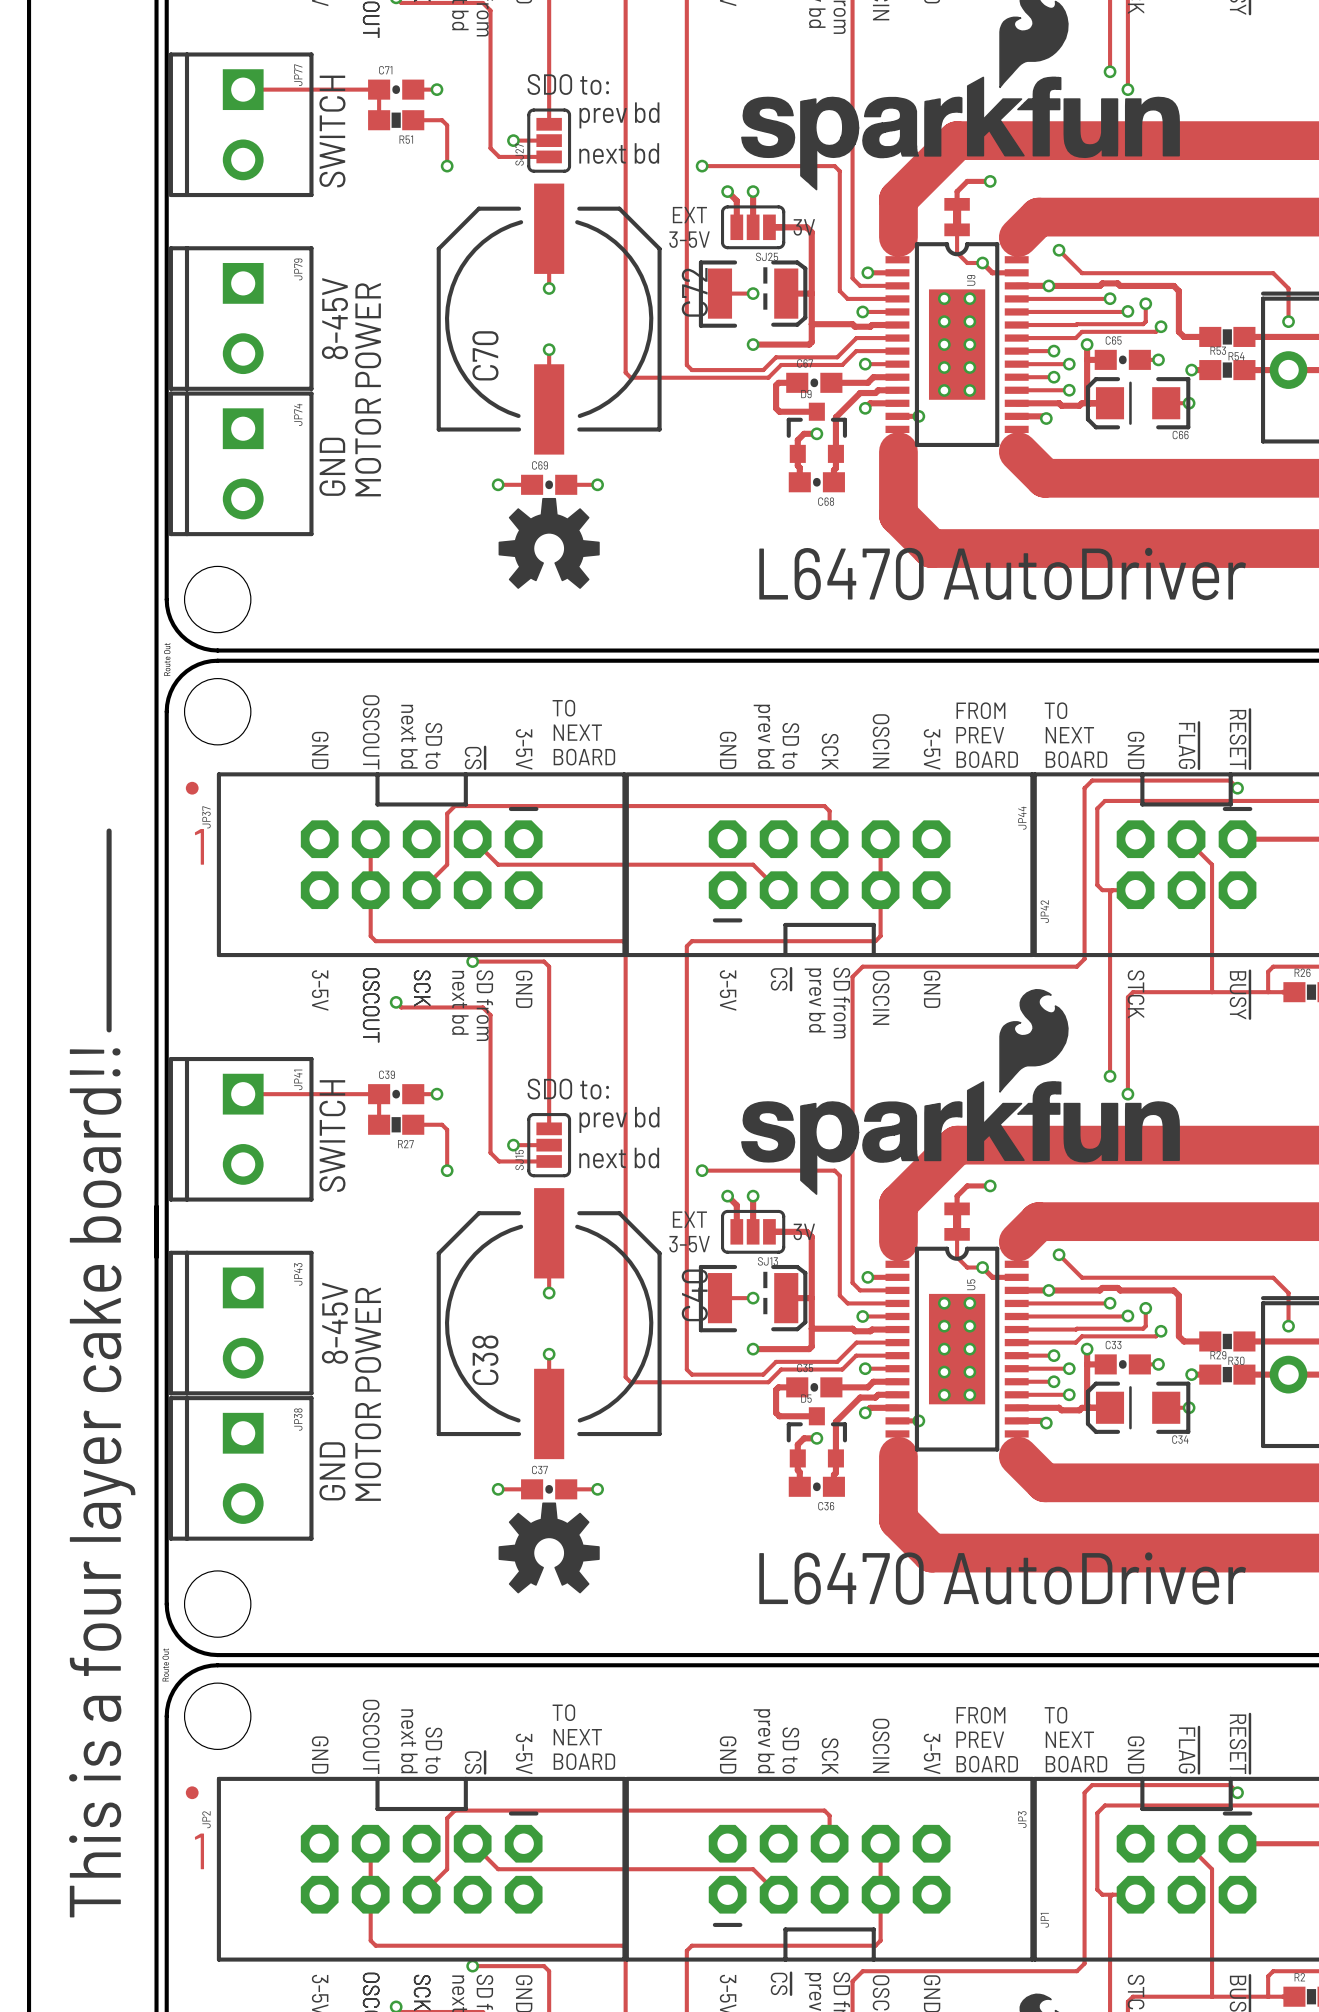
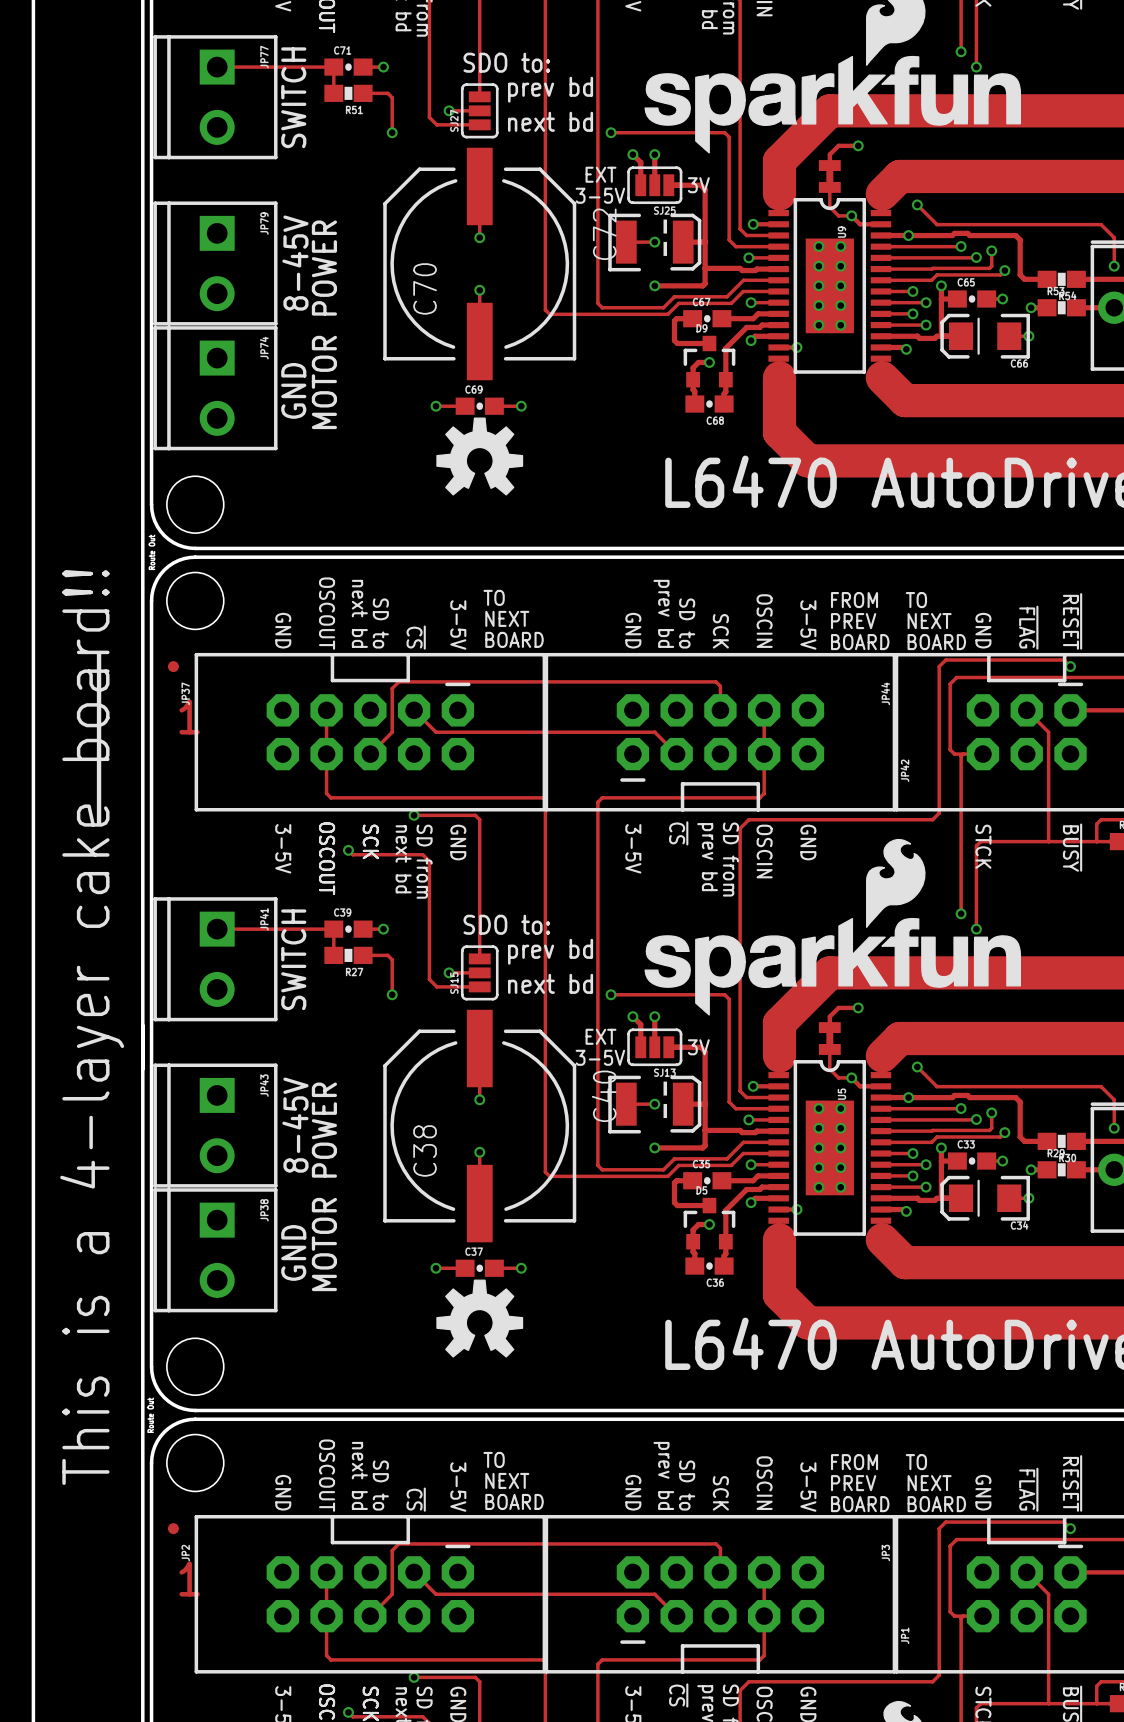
line: (109, 831) (109, 1029) -> (99, 653) (99, 824)
text: This is a four layer cake board!! (102, 1482) -> This is a 4-layer cake board!! (92, 1027)

